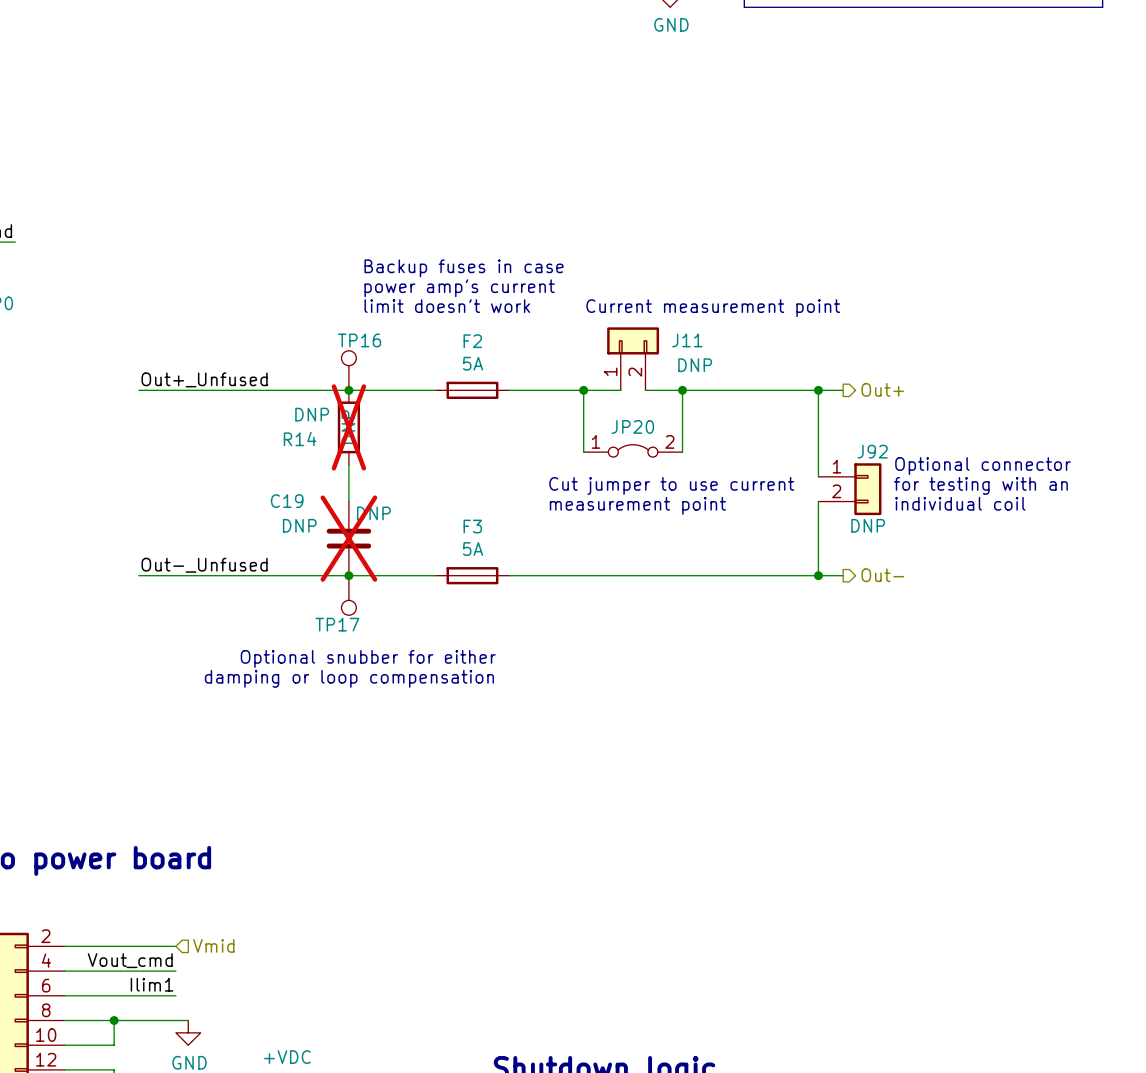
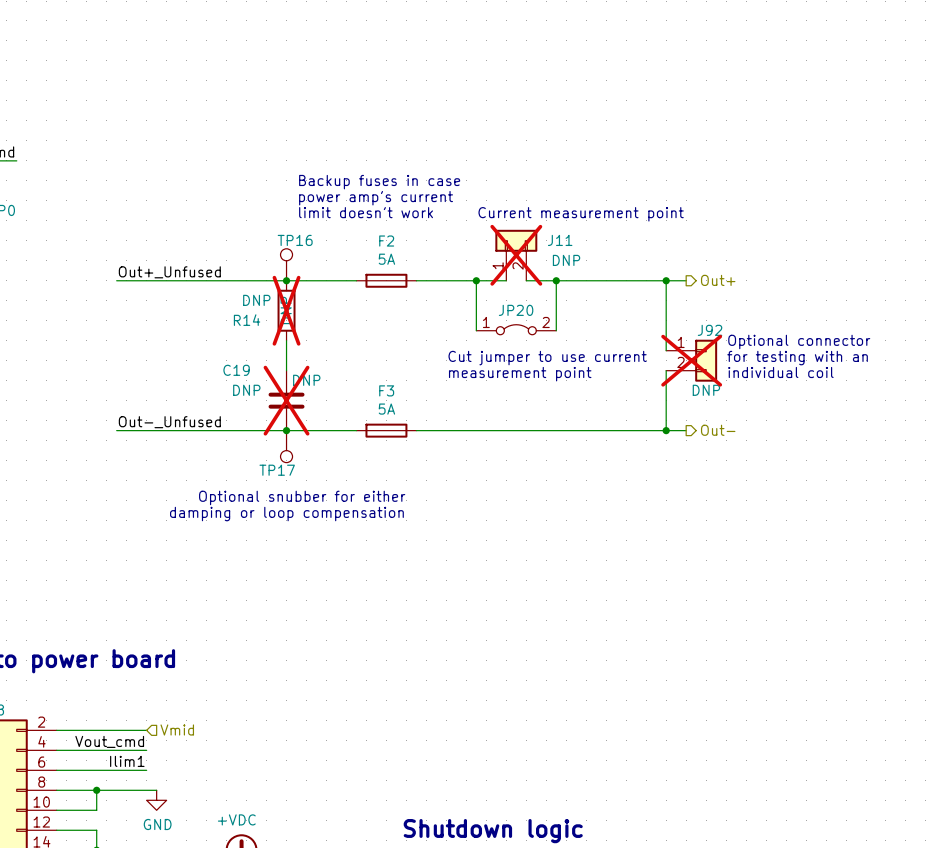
J11 do-not-place cross: none -> (516, 255)
J92 do-not-place cross: none -> (691, 360)

